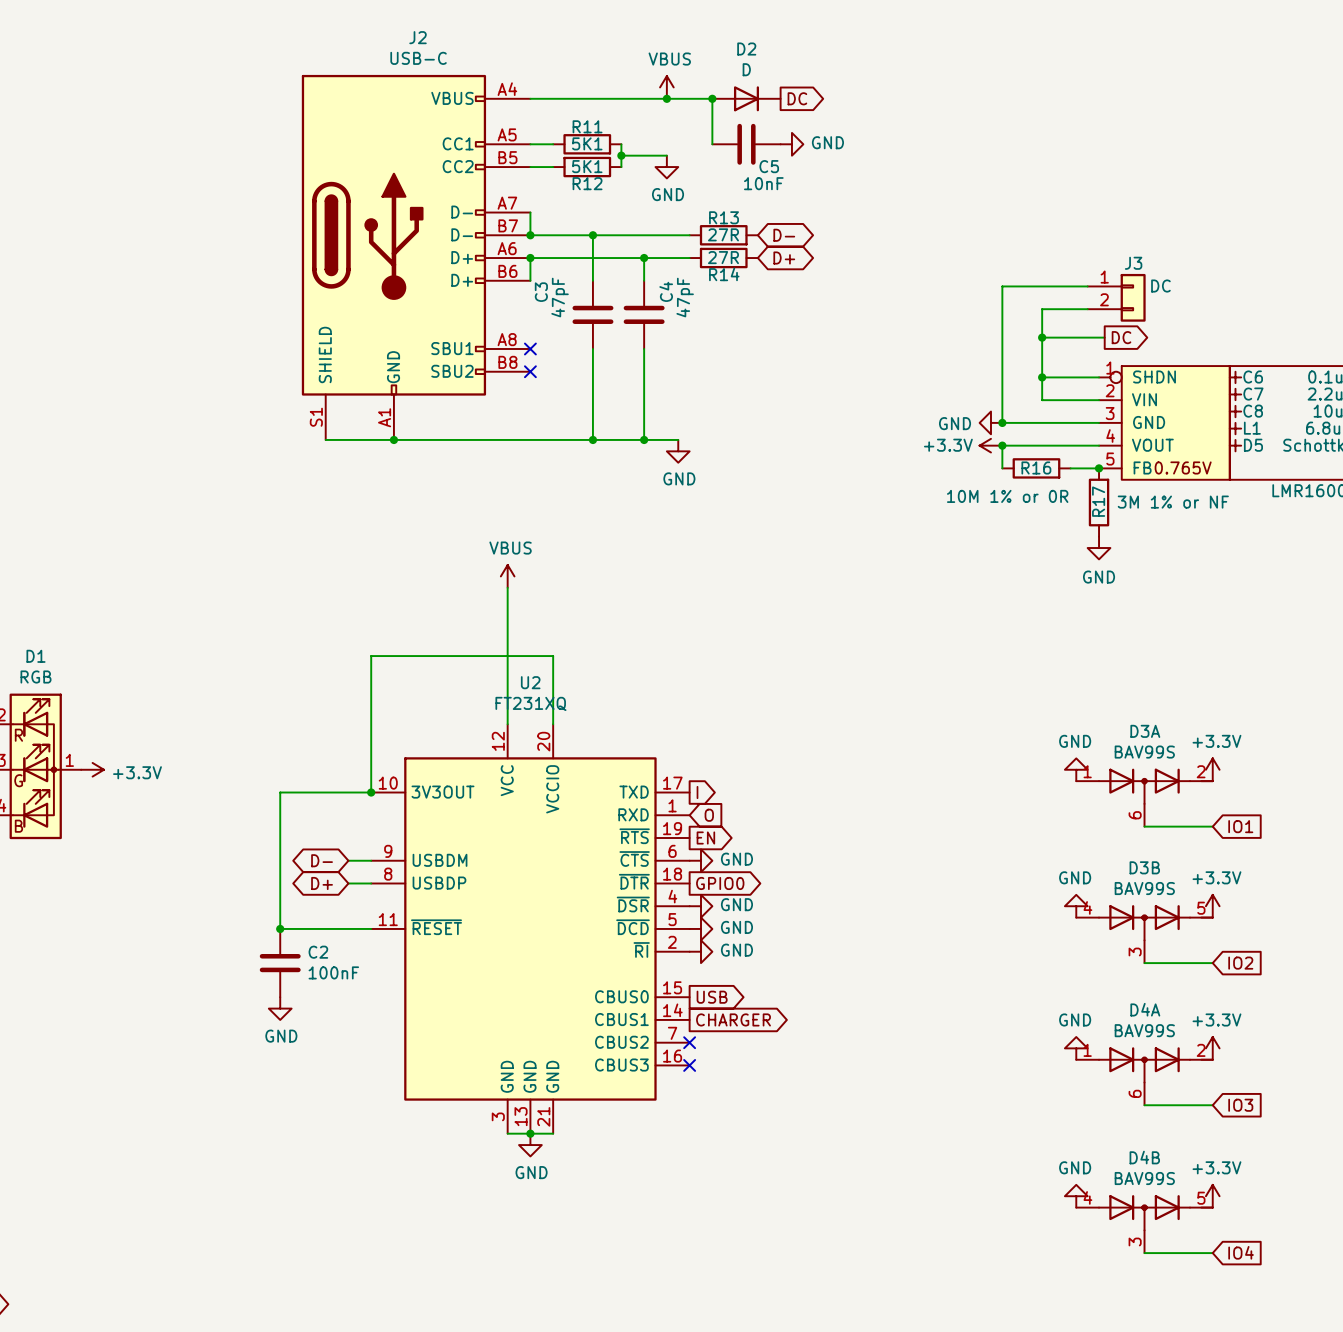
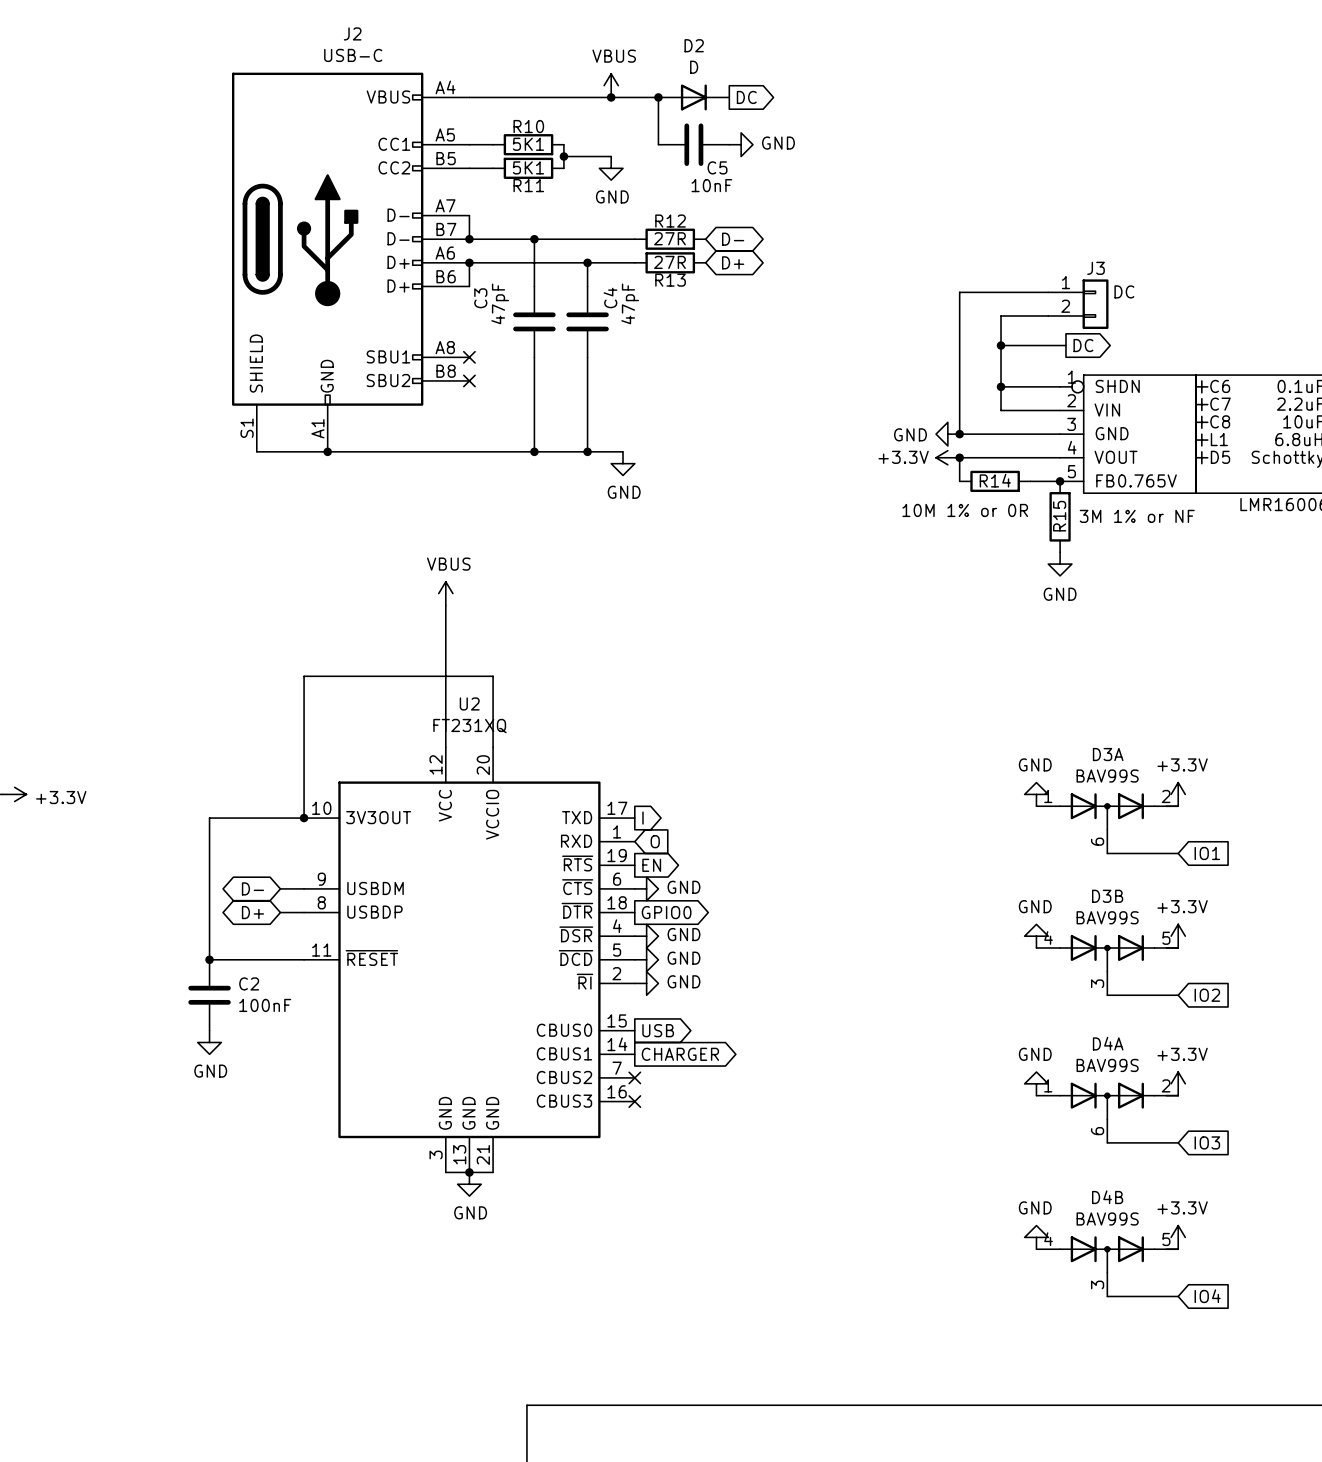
R11 name: R11 (587, 126) -> R10 (528, 126)
R12 name: R12 (587, 183) -> R11 (528, 185)
R13 name: R13 (724, 217) -> R12 (670, 221)
R14 name: R14 (724, 274) -> R13 (670, 280)
R16 name: R16 (1036, 467) -> R14 (995, 480)
R17 name: R17 (1098, 501) -> R15 (1059, 516)

